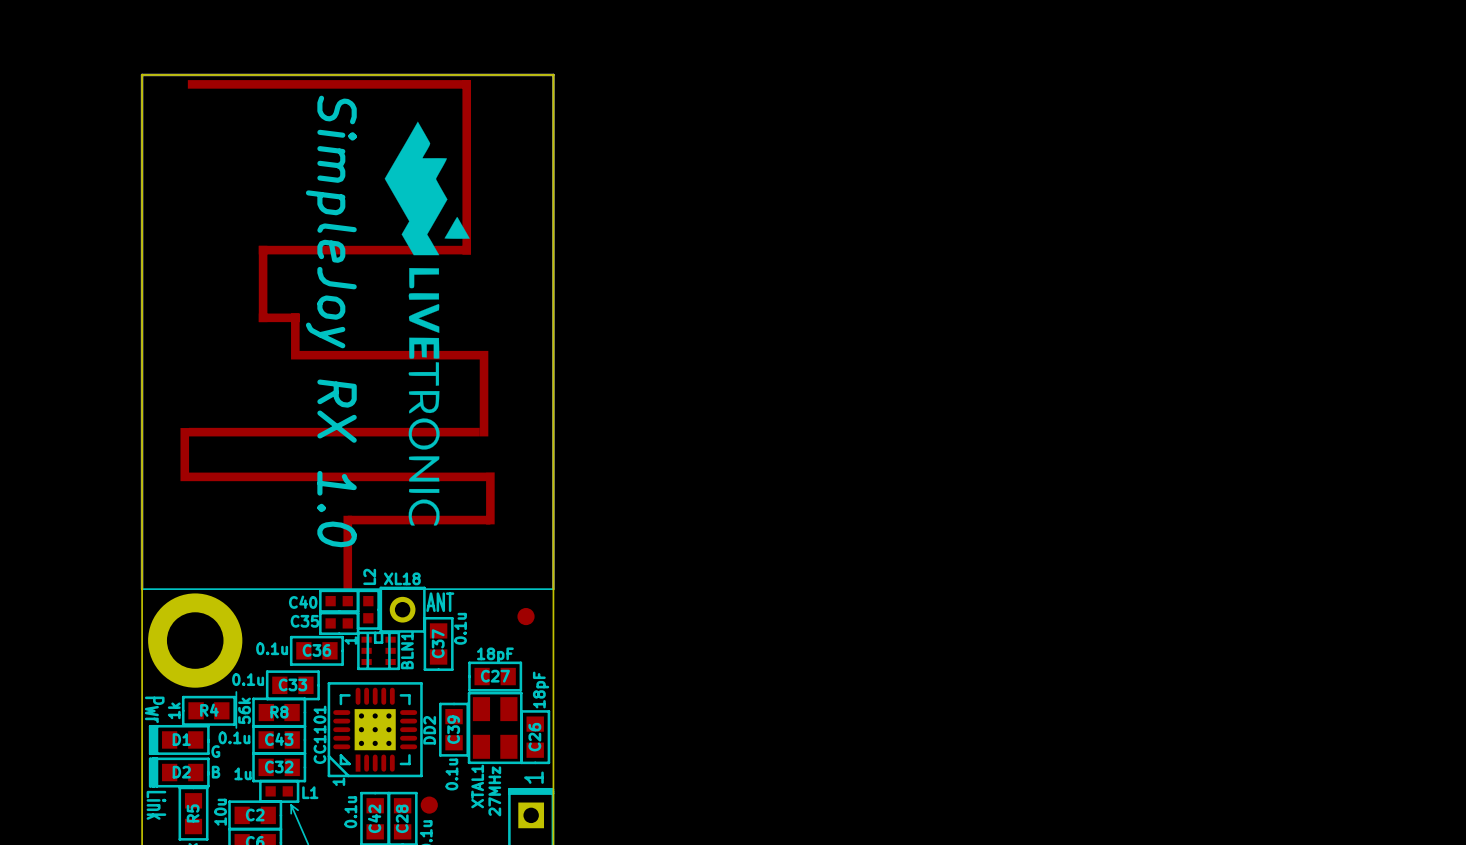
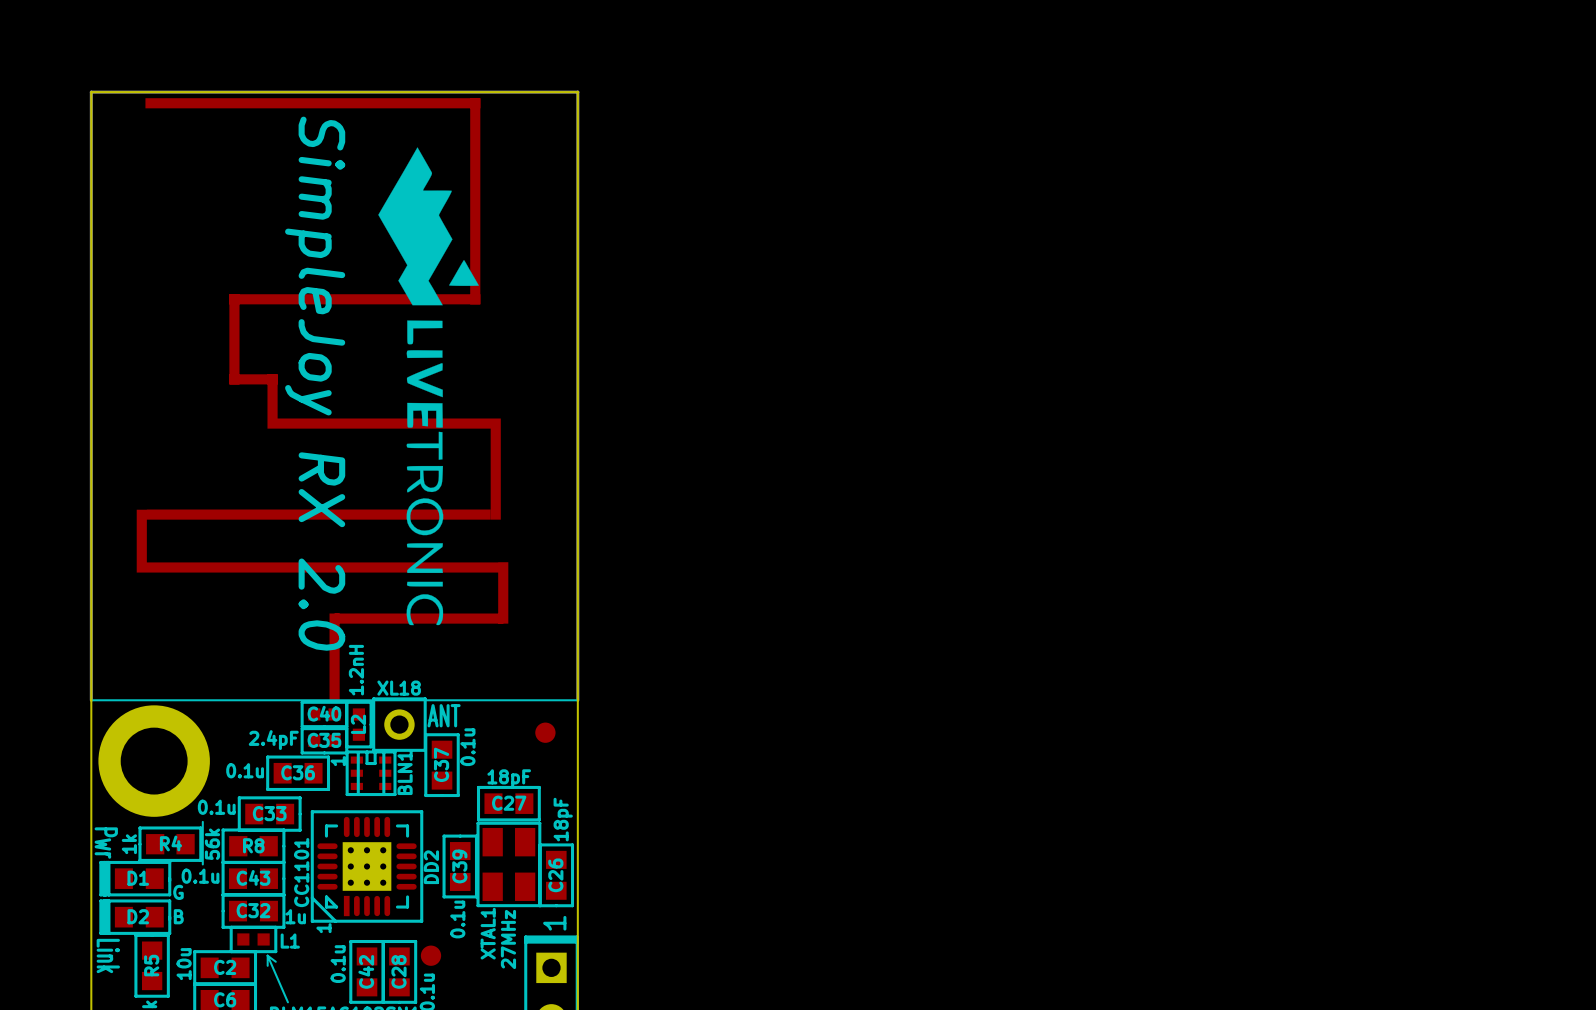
text: SimpleJoy RX 1.0 (331, 321) -> SimpleJoy RX 2.0 (315, 383)
L2 value: none -> 1.2nH (356, 670)
L2 name position: L2 (369, 576) -> L2 (358, 724)
C40 name position: C40 (303, 602) -> C40 (324, 713)
C35 name position: C35 (304, 621) -> C35 (324, 740)
C35 value: none -> 2.4pF (273, 740)
C32 rotation: 0° (279, 767) -> 180° (253, 911)

